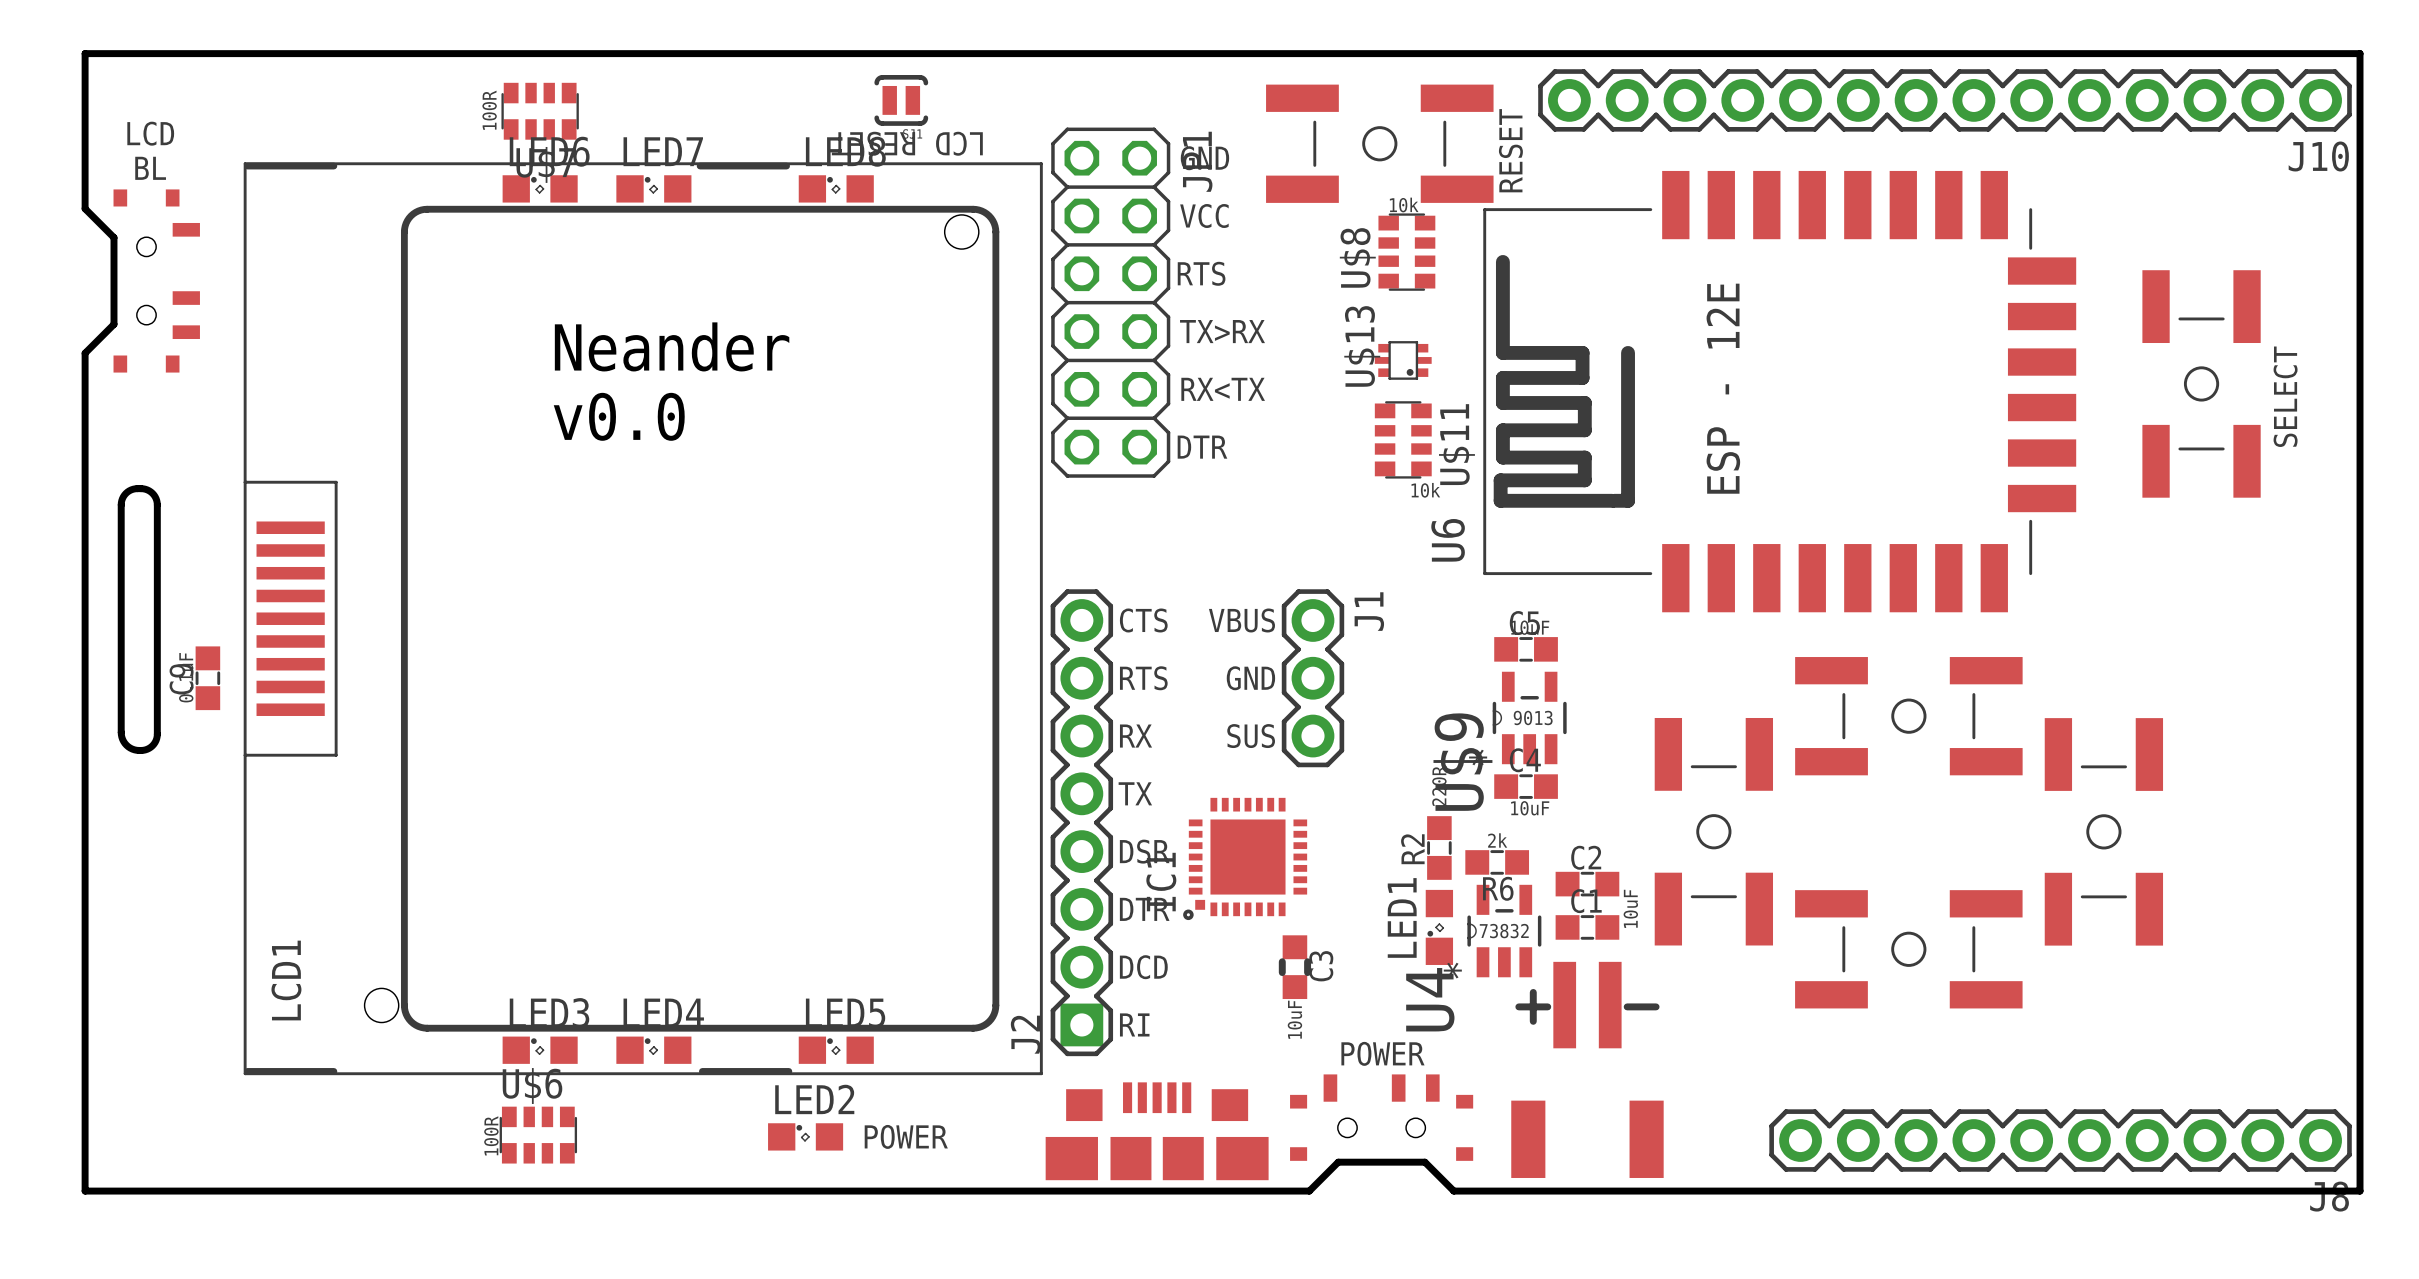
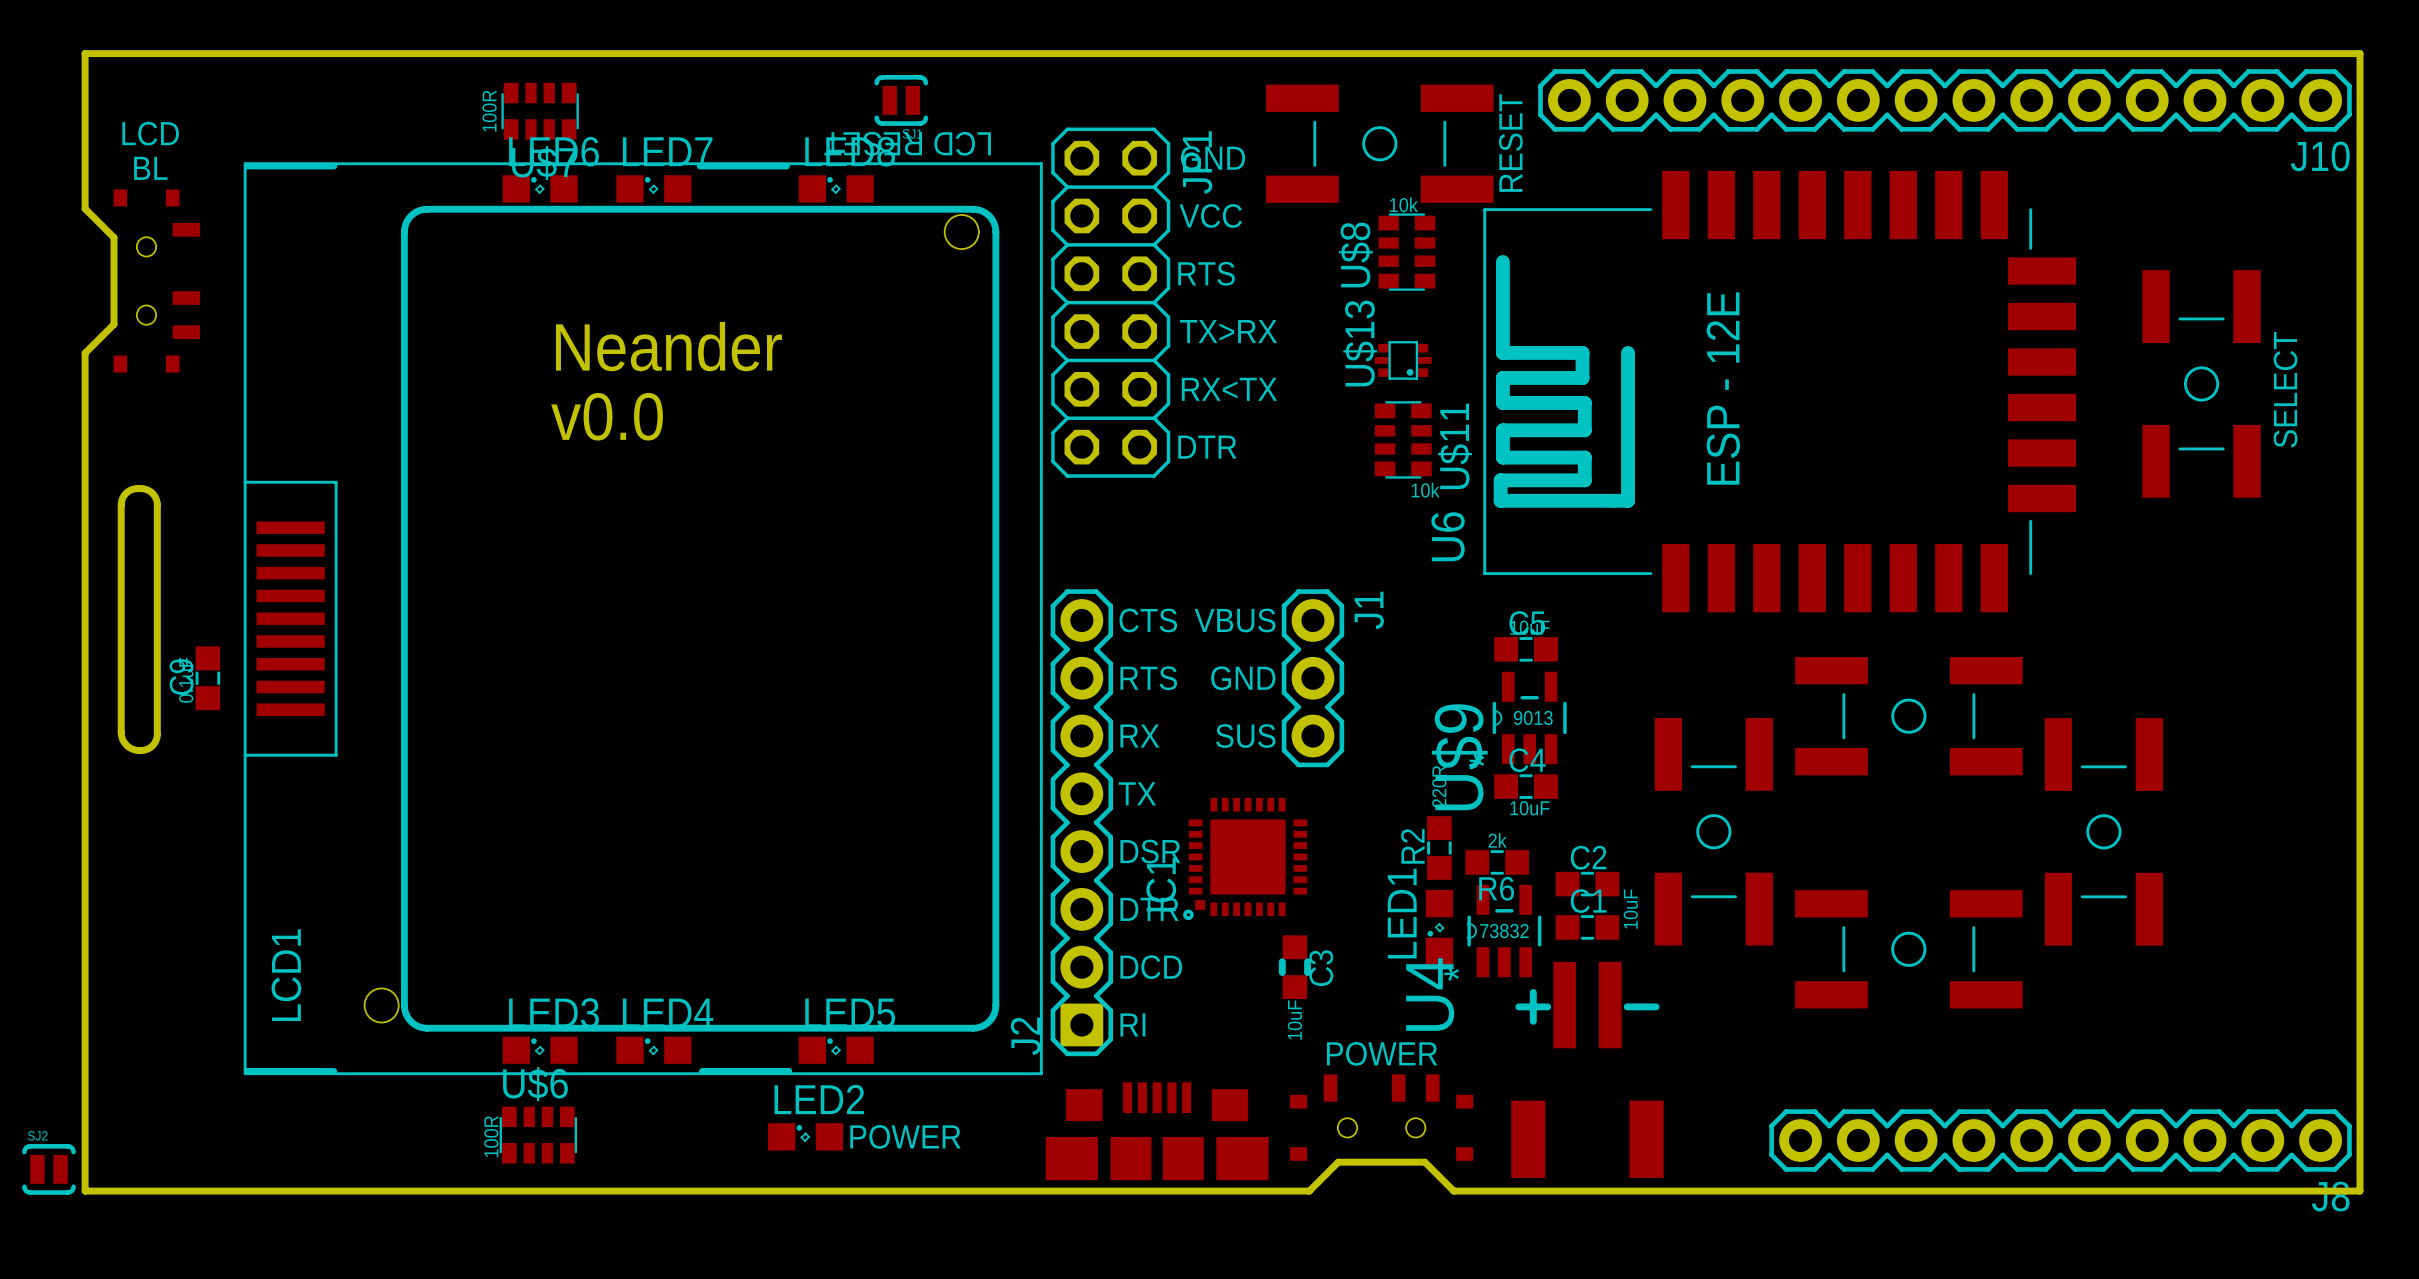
SJ2: none -> (48, 1169)

